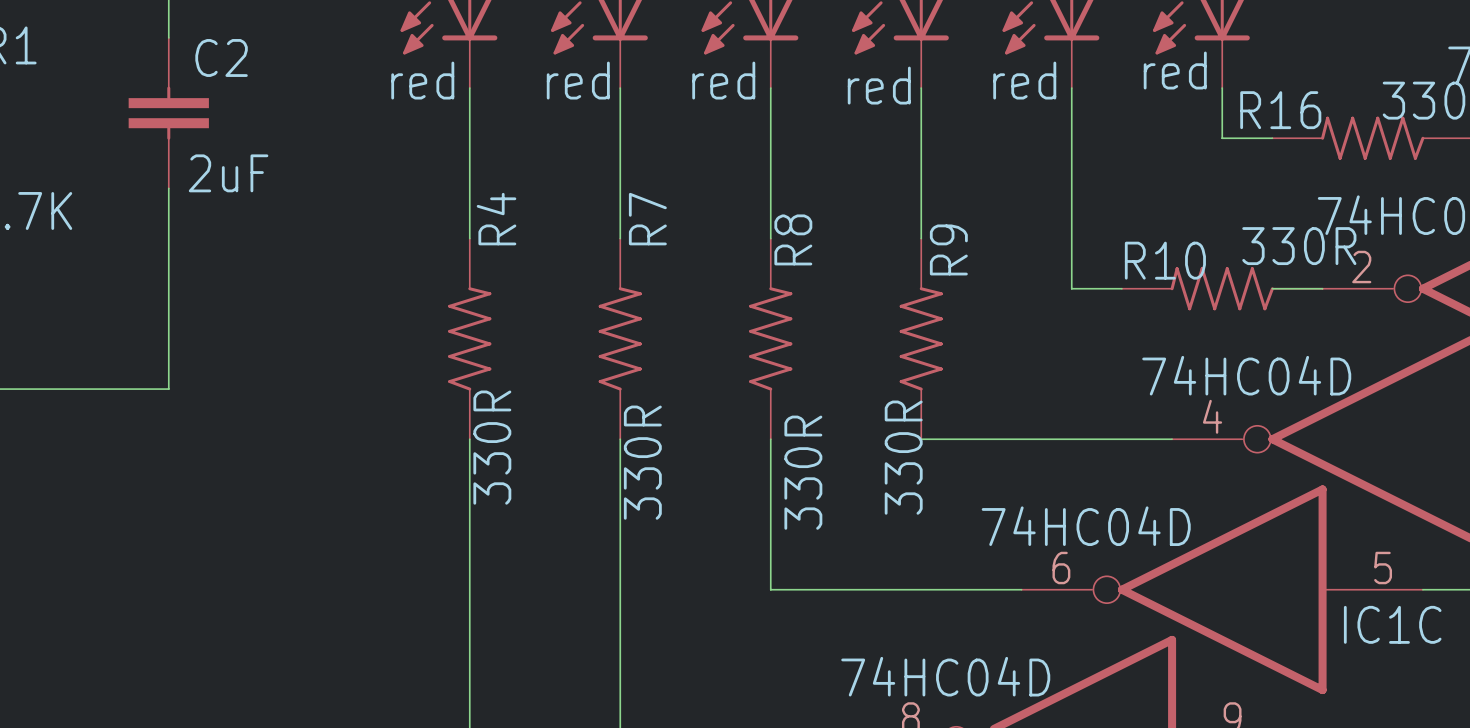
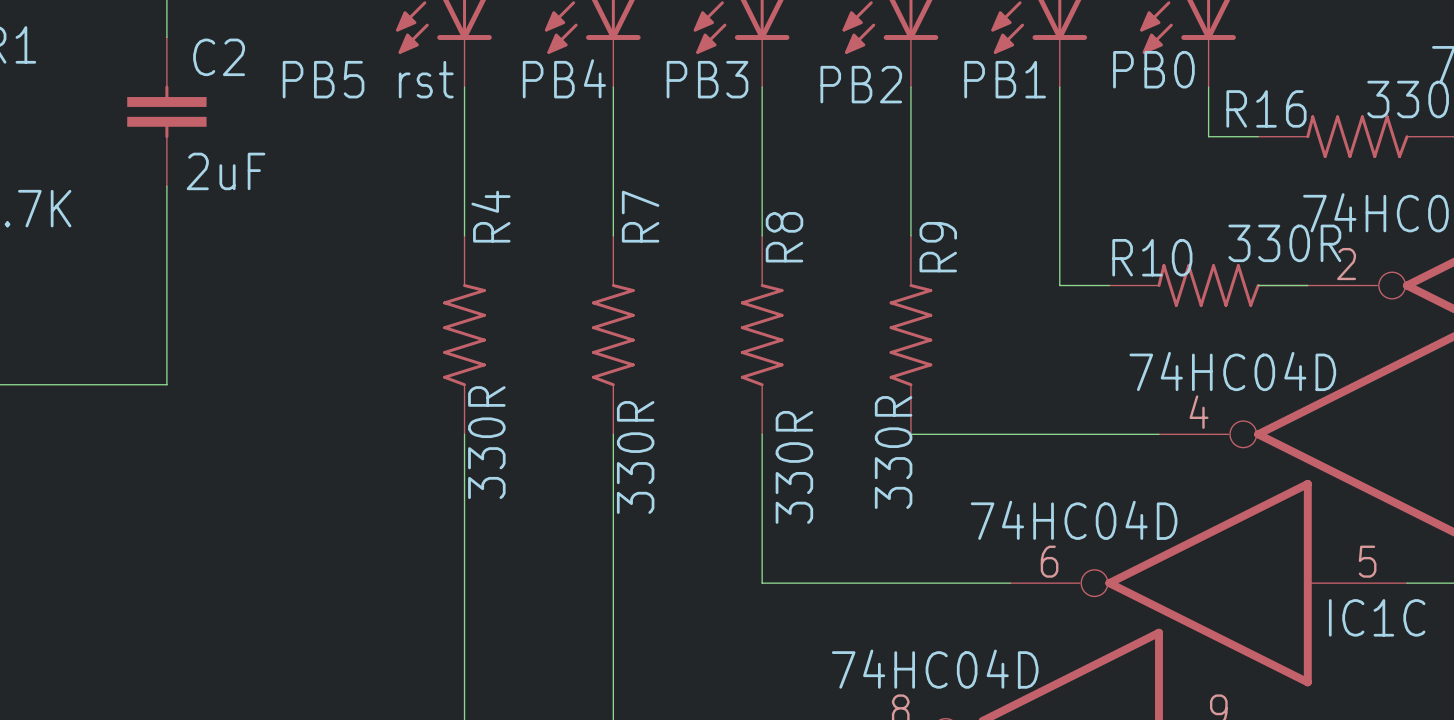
part value: red (1175, 70) -> PB0 (1153, 69)
part value: red (422, 80) -> PB5 rst (368, 79)
part value: red (578, 80) -> PB4 (564, 78)
part value: red (723, 80) -> PB3 (707, 79)
part value: red (1024, 80) -> PB1 (1005, 79)
part value: red (879, 85) -> PB2 (861, 84)

